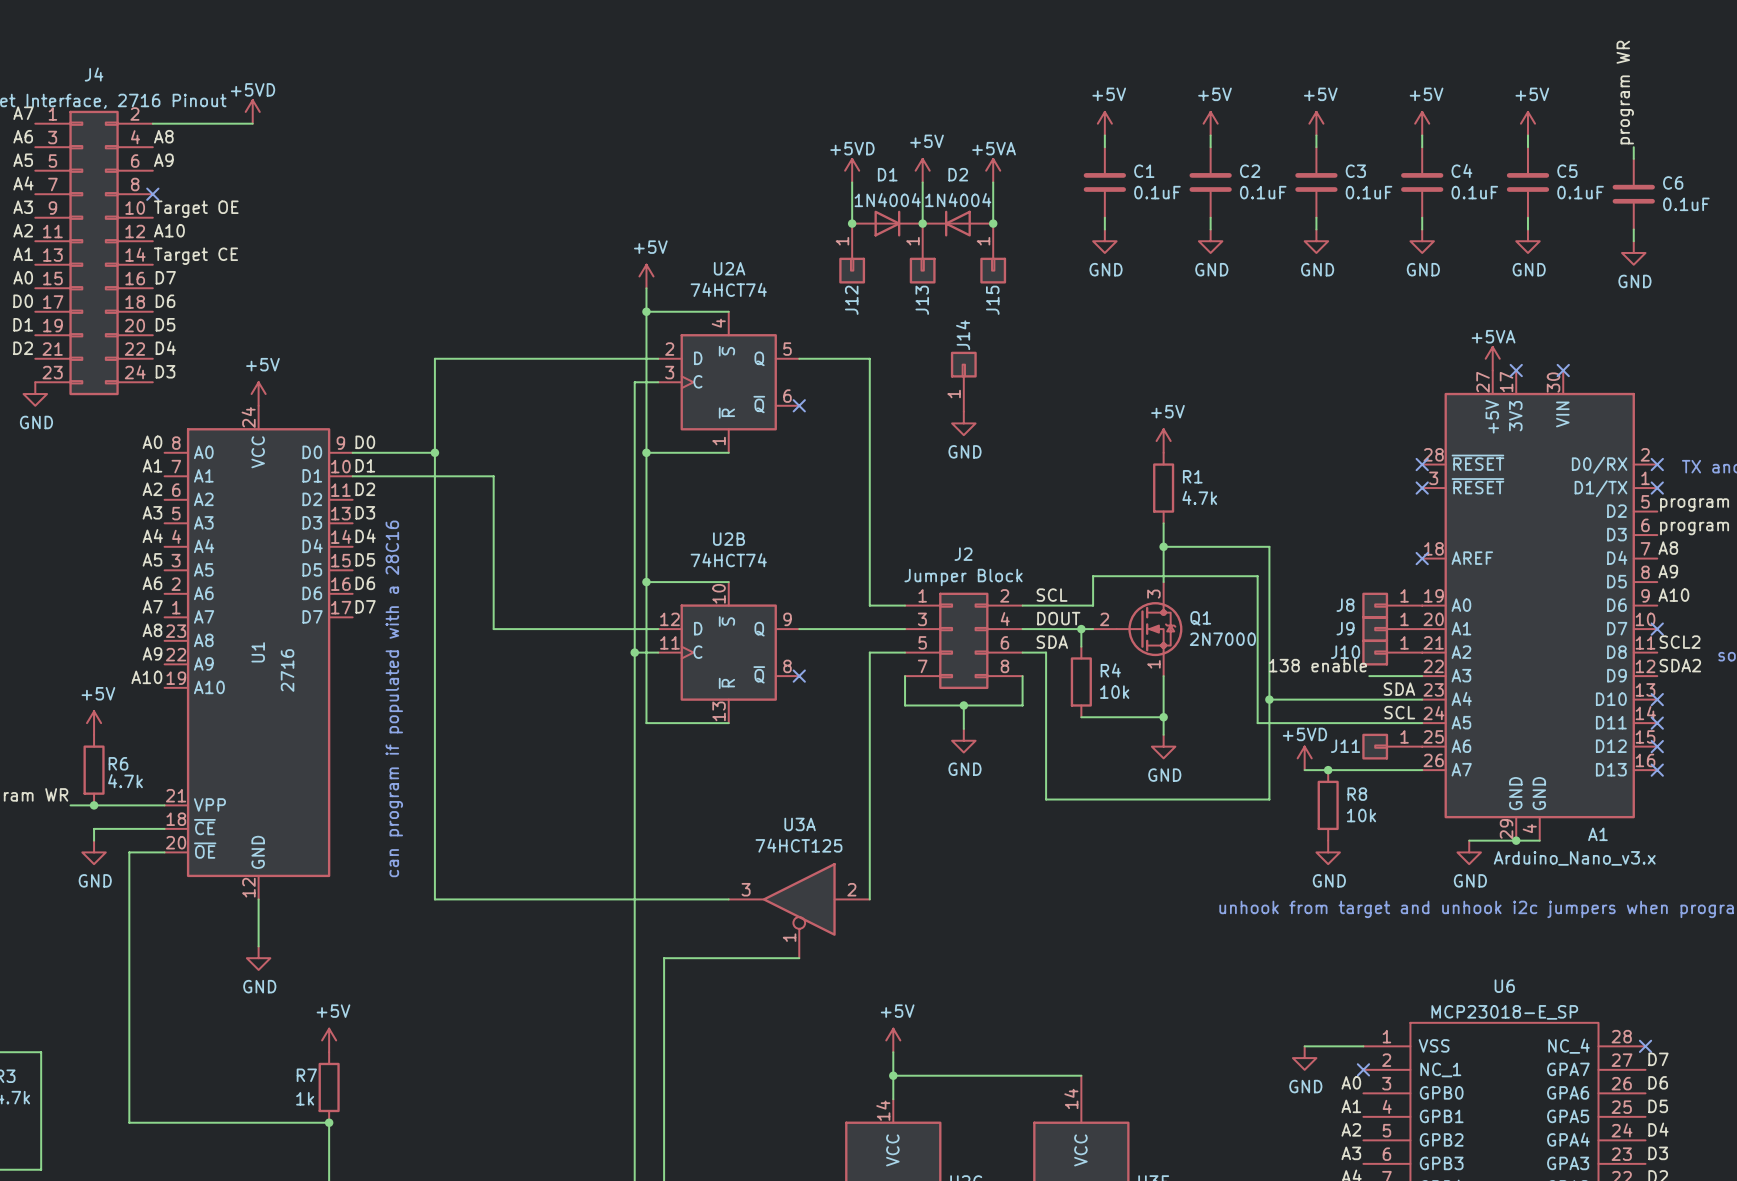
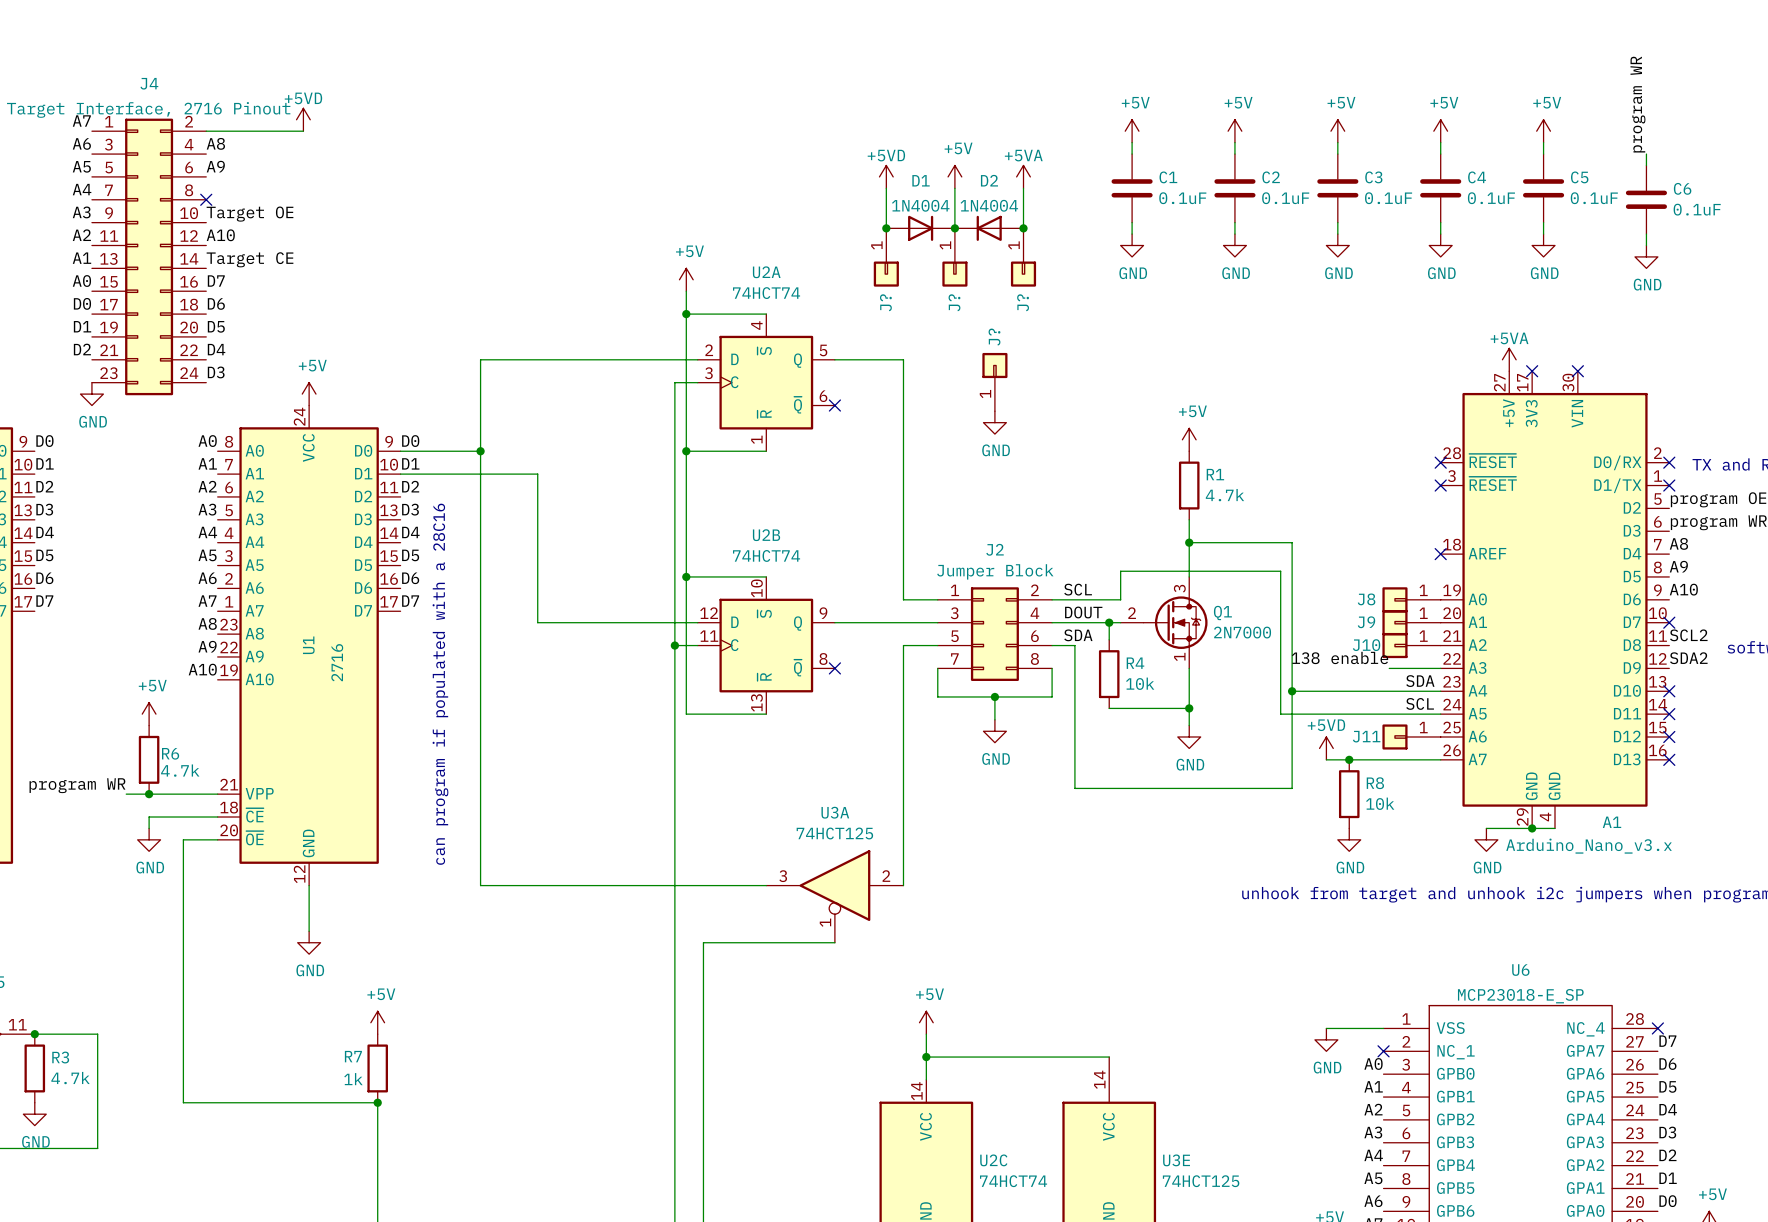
J12 name: J12 (851, 300) -> J? (885, 302)
J13 name: J13 (922, 300) -> J? (954, 302)
J15 name: J15 (992, 300) -> J? (1023, 302)
J14 name: J14 (963, 335) -> J? (994, 337)

